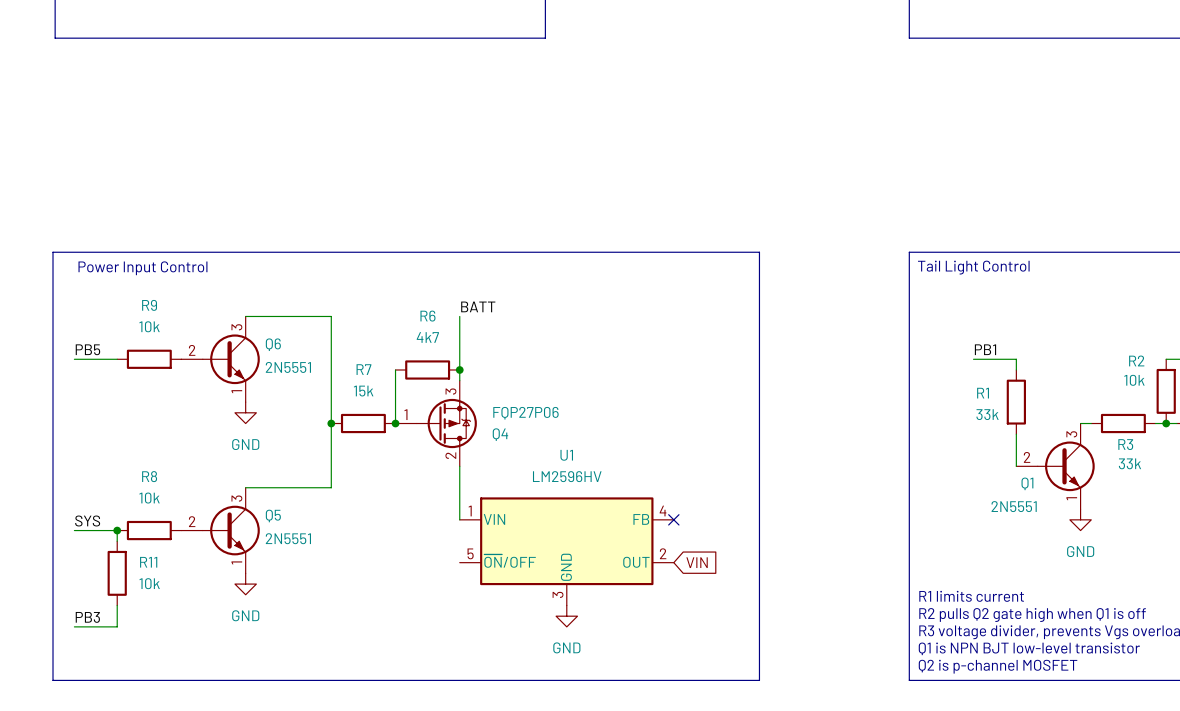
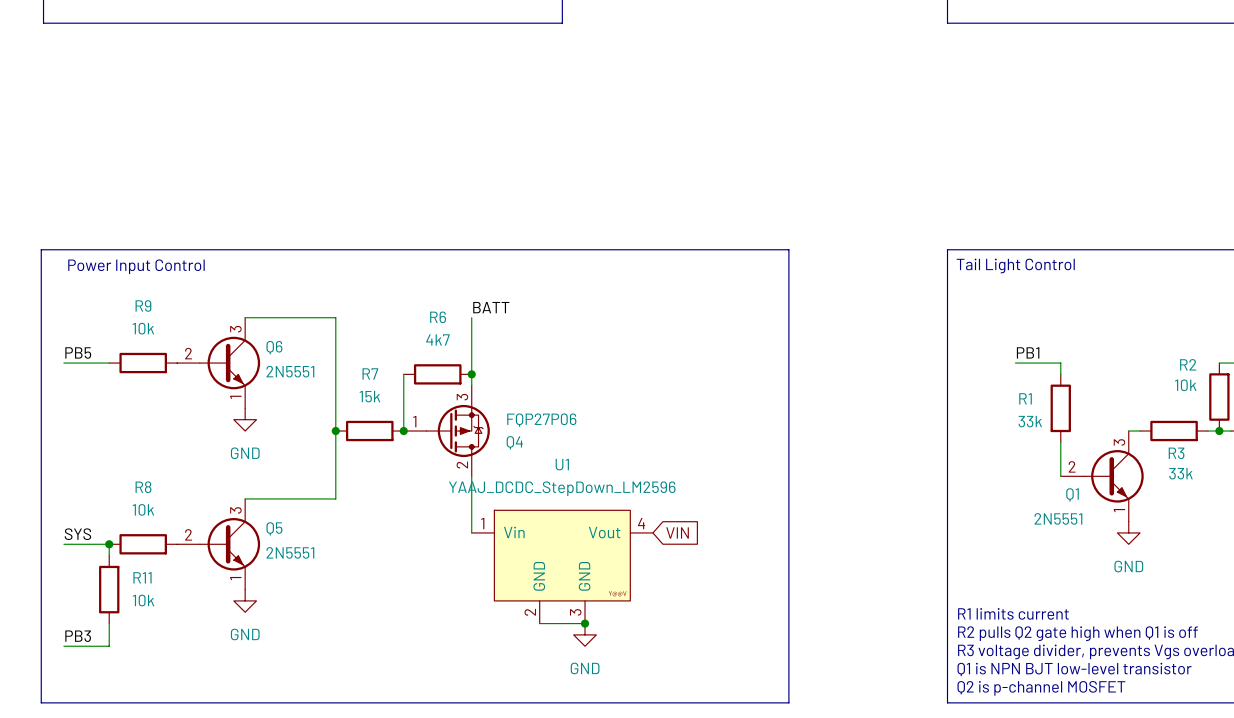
U1 value: LM2596HV (567, 476) -> YAAJ_DCDC_StepDown_LM2596 (562, 488)
U1 symbol: [459, 497, 674, 606] -> [471, 510, 653, 624]
no-connect mark: (673, 519) -> none
global label position: VIN (697, 562) -> VIN (677, 532)
wire: none -> (539, 623) (585, 623)
junction: none -> (585, 623)

